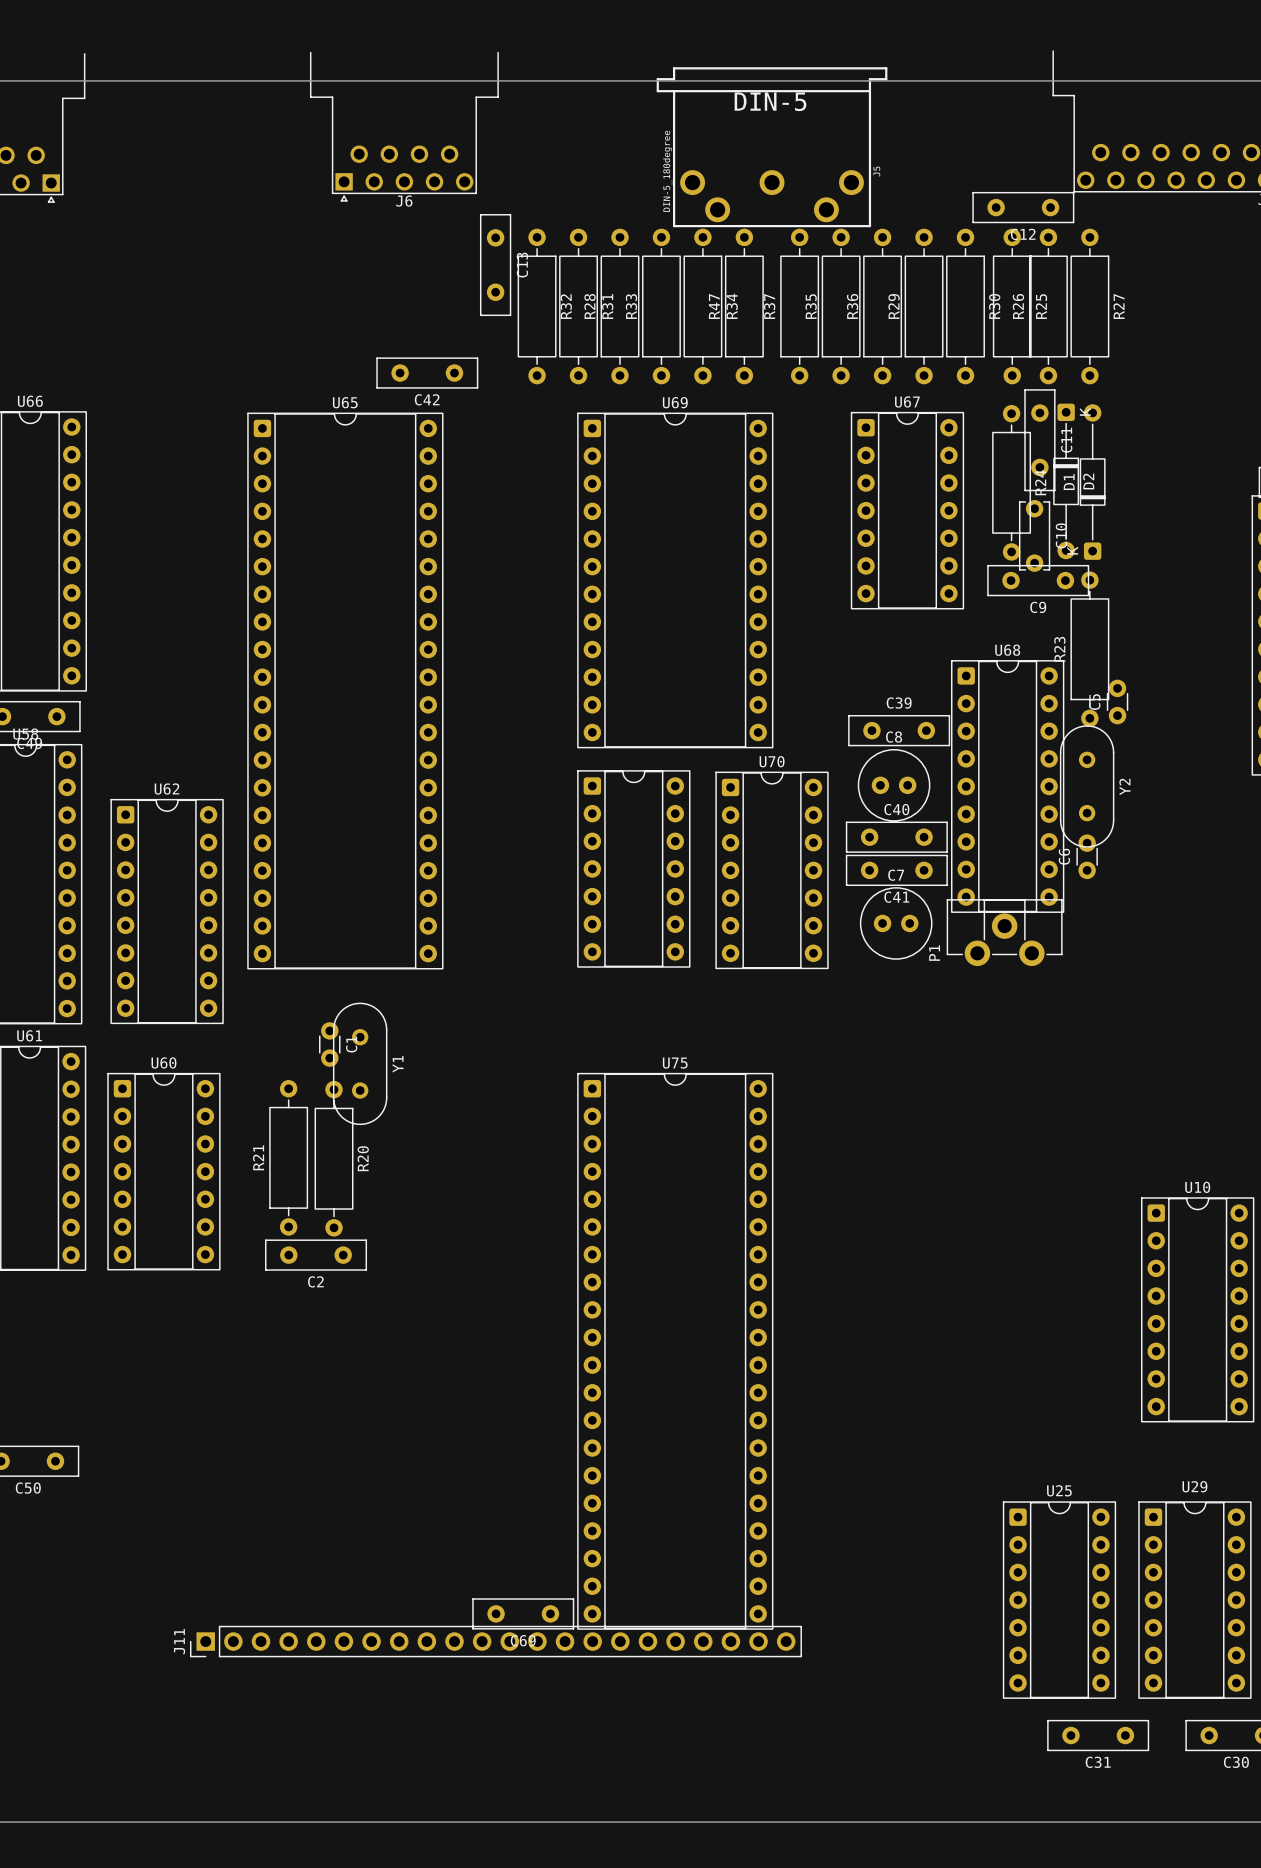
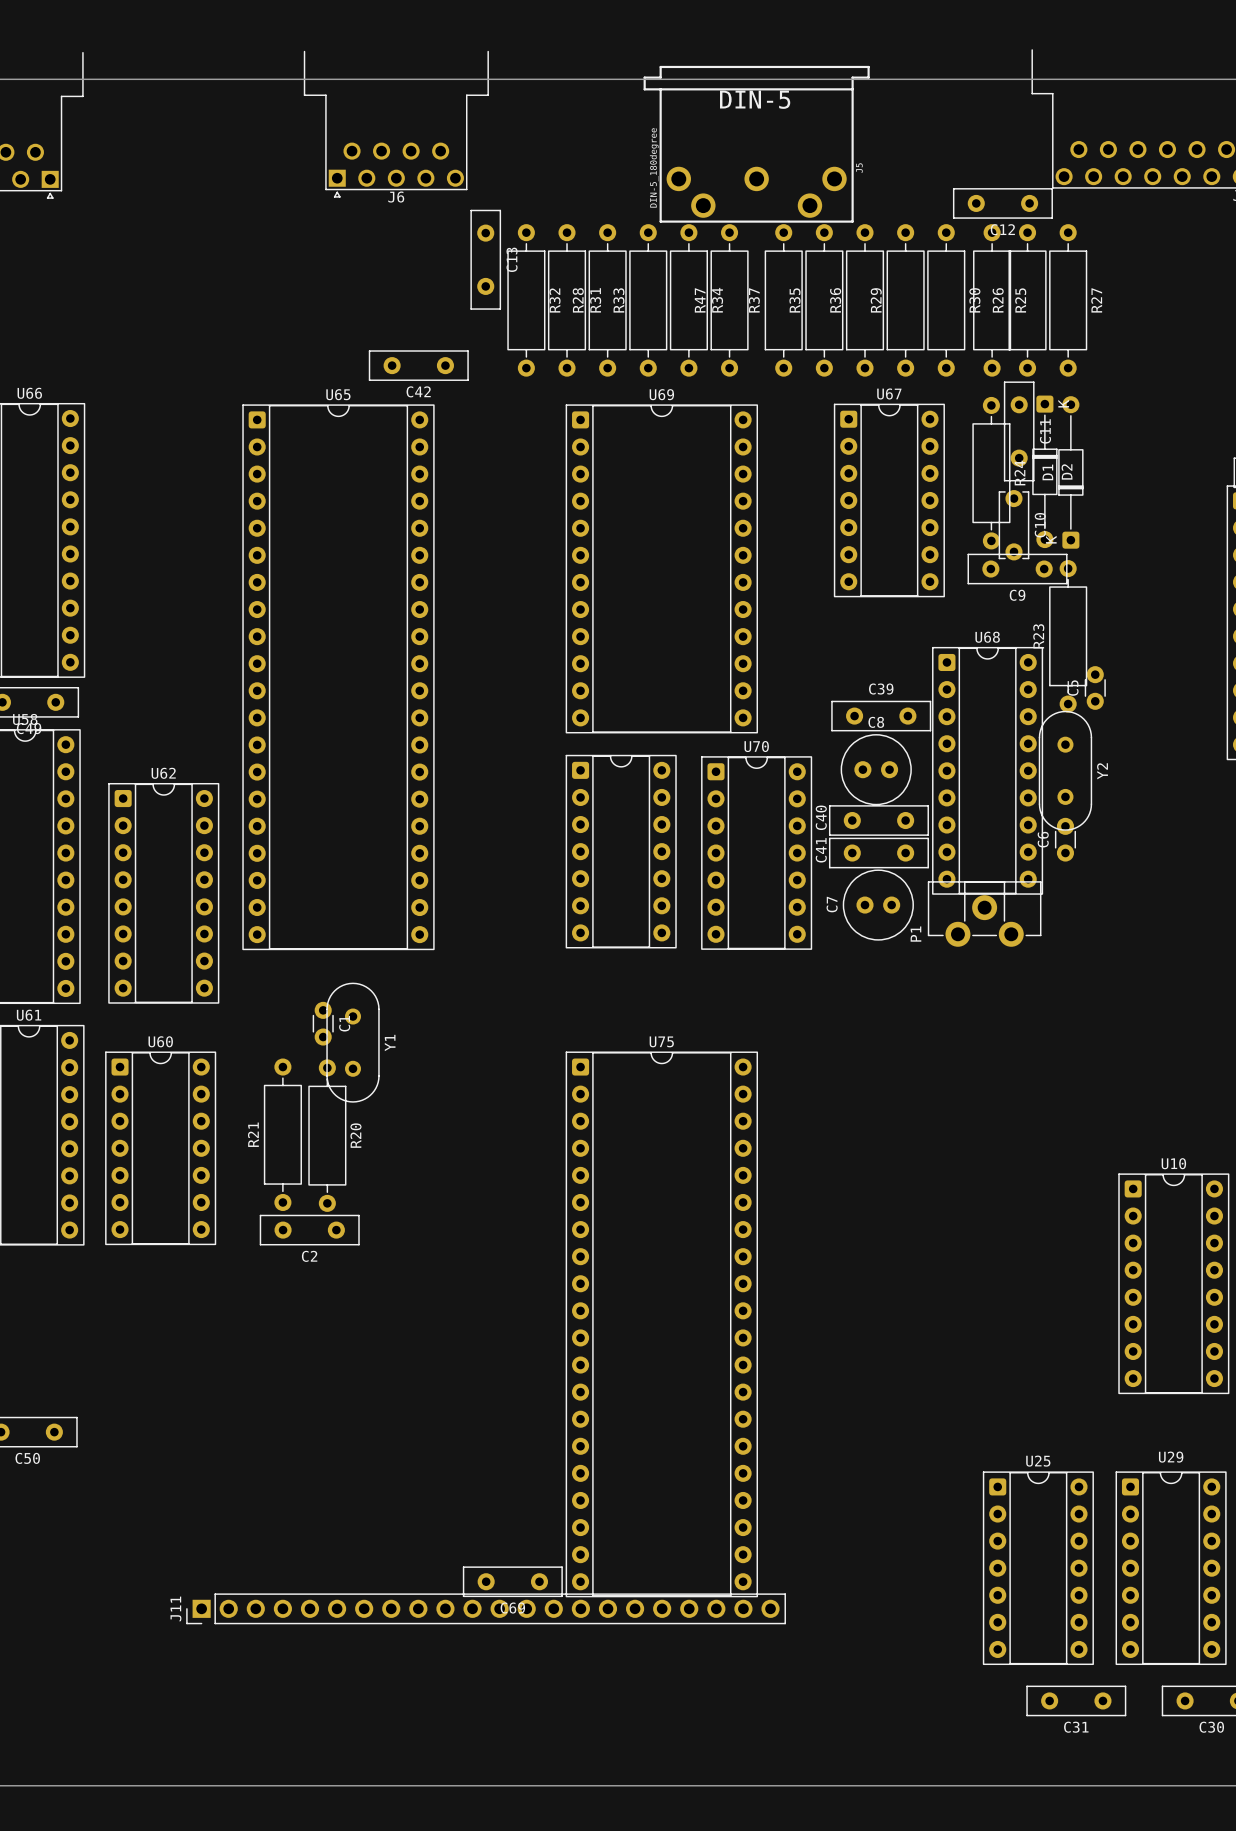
C40 name rotation: 0° (896, 809) -> 90° counterclockwise (821, 817)
C40 name position: C40 (896, 809) -> C40 (821, 817)
C7 name rotation: 0° (896, 875) -> 90° counterclockwise (832, 904)
C7 name position: C7 (896, 875) -> C7 (832, 904)
C41 name rotation: 0° (896, 897) -> 90° counterclockwise (821, 850)
C41 name position: C41 (896, 897) -> C41 (821, 850)

